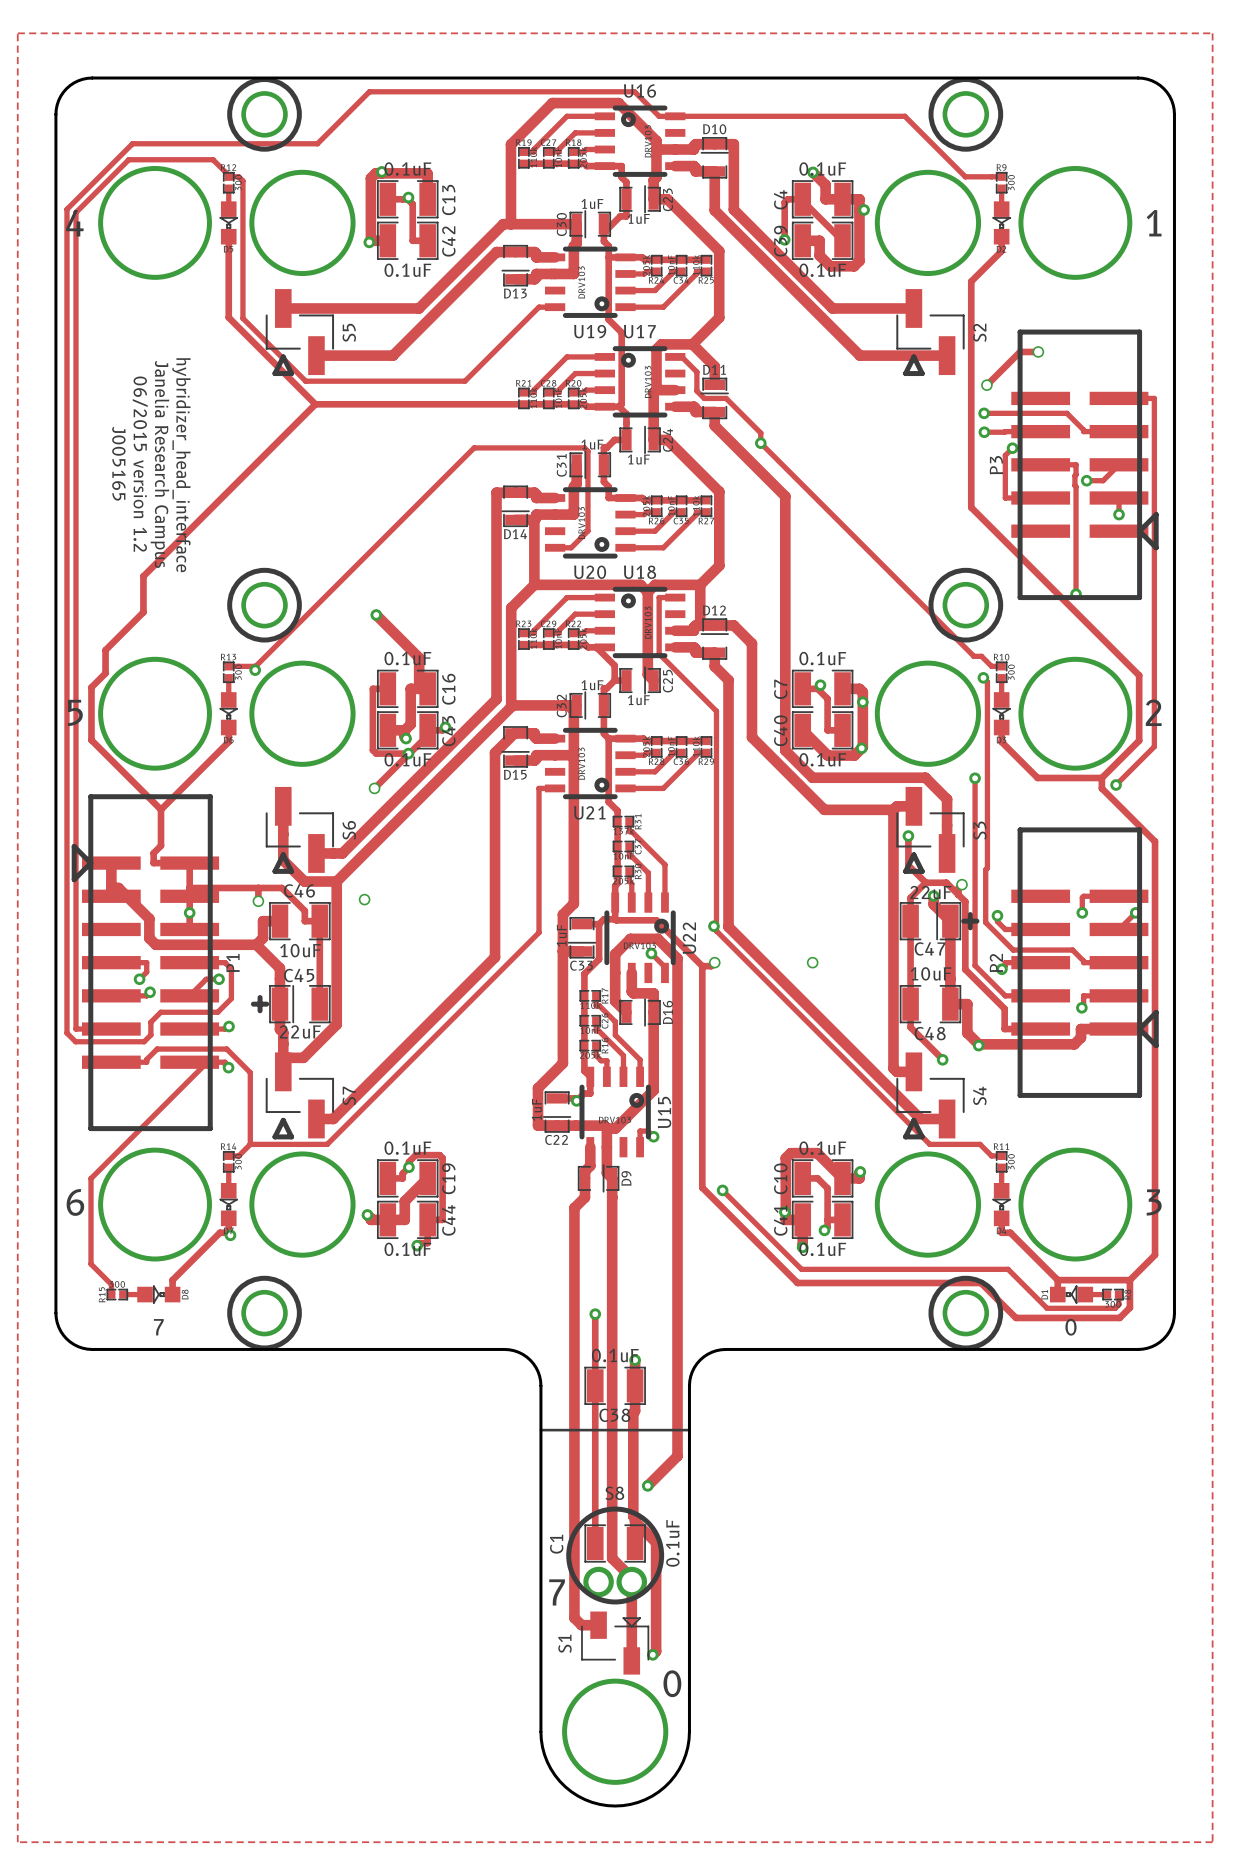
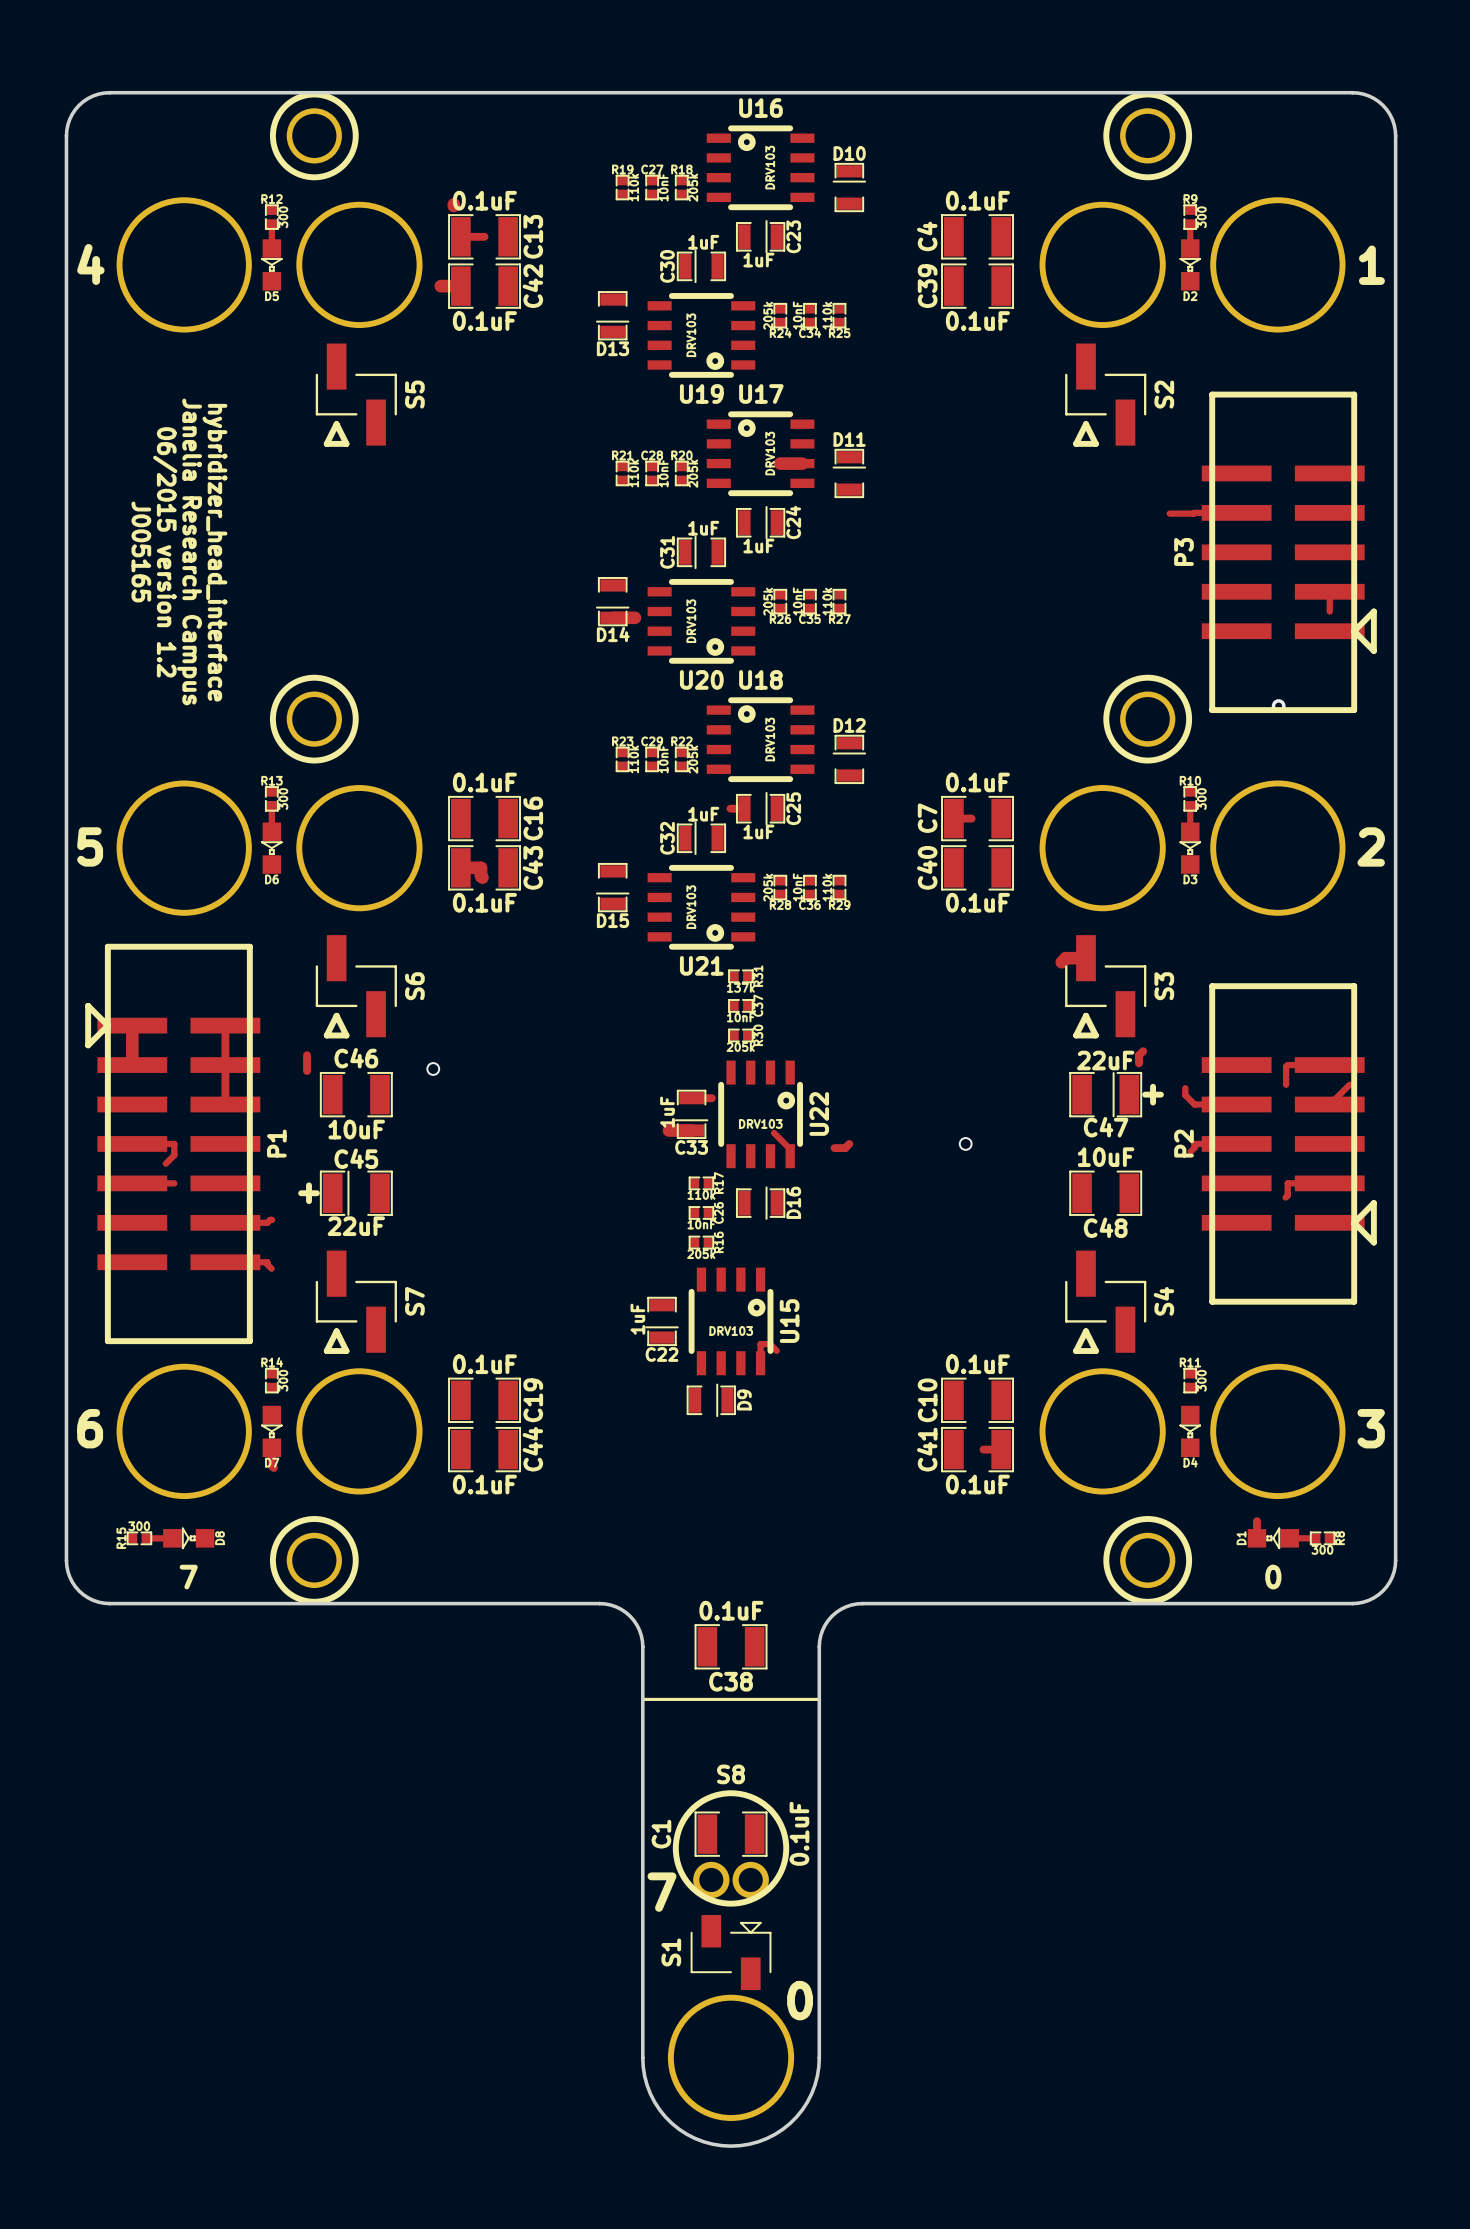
zone outline: (17, 33) (17, 1842) (1212, 1842) (1212, 33) (17, 33) -> none
track: (604, 116) (567, 116) (533, 149) (533, 151) (523, 151) -> none
track: (604, 132) (575, 132) (558, 149) (558, 151) (548, 151) -> none
track: (604, 149) (573, 151) -> none
track: (656, 149) (694, 149) (695, 144) (733, 144) (733, 209) (832, 308) (913, 308) -> none
track: (523, 163) (621, 166) (621, 177) (626, 182) (626, 216) (620, 216) (603, 232) -> none
track: (675, 166) (694, 166) (695, 171) (714, 171) (714, 210) (859, 355) (947, 355) -> none
via: (381, 171) -> none
track: (813, 172) (825, 184) (825, 199) (859, 199) (859, 260) (854, 266) (830, 266) (819, 255) (819, 240) (802, 240) -> none
via: (813, 172) -> none
track: (228, 176) (238, 176) (242, 180) (242, 318) (305, 381) (464, 381) (539, 307) (555, 307) -> none
track: (230, 176) (213, 159) (128, 159) (76, 212) (76, 1029) (111, 1029) -> none
track: (1001, 176) (965, 176) (904, 116) (659, 116) (634, 91) (369, 91) (317, 143) (132, 143) (66, 209) (66, 1033) (75, 1041) (144, 1041) (150, 1035) (150, 1022) (160, 1012) (217, 1012) (231, 998) (231, 969) (225, 962) (189, 962) -> none
track: (408, 197) (407, 199) (412, 204) (412, 240) (427, 240) -> none
via: (408, 197) -> none
track: (427, 199) (426, 173) (375, 173) (370, 178) (370, 240) (369, 242) -> none
via: (864, 209) -> none
track: (510, 224) (510, 144) (552, 103) (618, 103) (656, 140) (656, 177) (653, 180) (653, 199) (667, 199) (719, 251) (719, 317) (692, 344) -> none
track: (603, 224) (603, 241) (608, 246) (608, 319) (621, 332) (621, 404) (619, 406) -> none
track: (228, 236) (228, 317) (315, 404) -> none
track: (1001, 236) (1001, 251) (971, 281) (971, 507) (1139, 675) (1139, 740) (1101, 777) -> none
track: (784, 239) (784, 202) (787, 199) (802, 199) (842, 240) -> none
via: (784, 239) -> none
via: (369, 242) -> none
track: (555, 257) (536, 257) (534, 252) (496, 252) (392, 355) (316, 355) -> none
track: (608, 257) (642, 257) (644, 259) (706, 259) -> none
track: (656, 271) (625, 273) -> none
track: (681, 271) (671, 271) (671, 274) (655, 290) (625, 290) -> none
track: (706, 271) (696, 271) (696, 274) (663, 307) (625, 307) -> none
track: (515, 279) (534, 279) (536, 273) (573, 273) (573, 246) (576, 243) (576, 224) (503, 224) (419, 308) (283, 308) -> none
track: (692, 344) (714, 366) (714, 384) -> none
track: (692, 344) (661, 344) (656, 349) (653, 439) (667, 439) (719, 491) (719, 565) (700, 584) -> none
track: (1038, 351) (1020, 351) (986, 385) -> none
via: (1038, 351) -> none
track: (604, 356) (567, 356) (533, 390) (533, 392) (523, 392) -> none
track: (675, 356) (681, 356) (696, 372) (696, 391) (704, 398) (726, 398) (760, 433) (760, 443) (973, 656) (981, 656) (991, 666) (1001, 666) -> none
track: (604, 373) (575, 373) (558, 390) (558, 392) (548, 392) -> none
via: (986, 385) -> none
track: (604, 390) (573, 392) -> none
track: (1119, 398) (1154, 398) (1154, 746) (1116, 784) -> none
track: (315, 404) (584, 404) (586, 406) (619, 406) -> none
track: (315, 404) (143, 576) (143, 612) (105, 650) (105, 673) (91, 687) (91, 740) (161, 809) -> none
track: (619, 406) (626, 414) (626, 439) (614, 439) (606, 447) (603, 447) (603, 481) (608, 486) (608, 498) (642, 498) (644, 500) (706, 500) -> none
track: (675, 406) (694, 406) (695, 412) (714, 412) (714, 425) (785, 496) (785, 750) (812, 777) (925, 777) (947, 799) (947, 853) -> none
track: (984, 413) (1066, 413) (1083, 431) (1119, 431) -> none
via: (984, 413) -> none
via: (984, 432) -> none
via: (760, 443) -> none
track: (1012, 448) (1005, 455) (1005, 498) (1040, 498) -> none
via: (1012, 448) -> none
track: (576, 464) (576, 483) (573, 486) (573, 514) (536, 514) (534, 519) (534, 584) -> none
track: (1040, 464) (1076, 464) (1076, 594) -> none
track: (1119, 464) (1103, 480) (1086, 480) -> none
via: (1086, 480) -> none
track: (555, 498) (536, 498) (534, 492) (496, 492) (496, 699) (342, 853) (316, 853) -> none
track: (656, 512) (625, 514) -> none
track: (681, 512) (671, 512) (671, 514) (655, 531) (625, 531) -> none
track: (706, 512) (696, 512) (696, 514) (663, 547) (625, 547) -> none
via: (1119, 514) -> none
track: (555, 547) (571, 547) (587, 531) (587, 451) (584, 447) (474, 447) (255, 666) -> none
track: (534, 584) (640, 584) (647, 592) -> none
track: (534, 584) (511, 608) (511, 707) (336, 881) -> none
track: (700, 584) (700, 625) -> none
track: (700, 584) (655, 584) (647, 592) -> none
track: (647, 592) (647, 674) (653, 680) -> none
track: (604, 597) (567, 597) (533, 630) (533, 633) (523, 633) -> none
track: (675, 597) (659, 597) (659, 653) (716, 711) (716, 931) (929, 1144) (980, 1144) (991, 1155) (1001, 1155) -> none
track: (376, 614) (419, 657) (419, 688) -> none
via: (376, 614) -> none
track: (604, 614) (575, 614) (558, 630) (558, 633) (548, 633) -> none
track: (604, 630) (573, 633) -> none
track: (675, 630) (694, 630) (695, 625) (733, 625) (751, 643) (751, 737) (824, 809) (893, 809) (893, 1068) (896, 1071) (913, 1071) -> none
track: (523, 644) (585, 644) (588, 647) (604, 647) -> none
track: (596, 647) (614, 665) (614, 680) (606, 688) (603, 688) (603, 733) (608, 738) -> none
track: (675, 647) (694, 647) (695, 652) (714, 652) (714, 666) (728, 680) (728, 926) (920, 1118) (947, 1118) -> none
track: (228, 666) (255, 666) -> none
via: (255, 670) -> none
track: (983, 677) (987, 681) (985, 922) (1013, 950) (1072, 950) (1083, 962) (1119, 962) -> none
via: (983, 677) -> none
track: (820, 685) (817, 688) (827, 698) (827, 730) (842, 730) -> none
via: (820, 685) -> none
track: (387, 688) (372, 688) (372, 750) (376, 753) (409, 753) (427, 735) (427, 730) (442, 730) (445, 727) -> none
track: (427, 688) (410, 688) (410, 724) (404, 730) -> none
track: (842, 688) (859, 688) (862, 692) (862, 747) (854, 755) (827, 755) (802, 730) -> none
via: (862, 702) -> none
track: (511, 705) (576, 705) -> none
track: (568, 705) (573, 710) (573, 903) (562, 914) (562, 1063) (538, 1088) (538, 1125) (604, 1125) (606, 1128) -> none
track: (228, 727) (228, 741) (161, 809) -> none
via: (445, 727) -> none
track: (1001, 727) (1001, 741) (1037, 777) (1101, 777) -> none
via: (406, 738) -> none
track: (555, 738) (536, 738) (534, 733) (514, 733) (495, 752) (495, 957) (333, 1118) (316, 1118) -> none
track: (608, 738) (706, 741) -> none
track: (608, 738) (608, 802) (617, 810) (617, 883) (615, 885) (615, 919) (603, 919) (599, 924) (599, 959) (584, 973) (584, 1070) (590, 1076) (590, 1093) (584, 1093) (576, 1100) (574, 1098) (557, 1098) -> none
via: (861, 748) -> none
track: (656, 752) (625, 755) -> none
track: (681, 752) (671, 752) (671, 755) (655, 771) (625, 771) -> none
track: (706, 752) (696, 752) (696, 755) (663, 788) (625, 788) -> none
track: (408, 753) (374, 788) -> none
via: (408, 753) -> none
track: (573, 755) (536, 755) (534, 760) (515, 760) -> none
track: (1101, 777) (1101, 788) (1155, 841) (1155, 1255) (1129, 1280) -> none
track: (975, 778) (975, 965) (1005, 995) (1040, 995) -> none
via: (975, 778) -> none
via: (1116, 784) -> none
via: (374, 788) -> none
track: (555, 788) (539, 788) (539, 932) (327, 1144) (250, 1144) -> none
track: (283, 806) (283, 860) (304, 881) (336, 881) -> none
track: (161, 809) (161, 845) (153, 853) (153, 863) (189, 863) -> none
track: (629, 821) (629, 831) (631, 831) (664, 864) (664, 902) -> none
track: (908, 836) (908, 865) (925, 882) -> none
via: (908, 836) -> none
track: (629, 846) (629, 856) (631, 856) (648, 873) (648, 902) -> none
track: (629, 871) (631, 902) -> none
track: (336, 881) (336, 1024) (303, 1057) (283, 1057) -> none
track: (925, 882) (910, 897) (910, 1027) (942, 1059) -> none
track: (925, 882) (946, 882) (965, 901) (965, 969) (1004, 1008) (1004, 1029) (1040, 1029) -> none
via: (962, 884) -> none
track: (111, 887) (118, 887) (149, 918) (149, 938) (155, 944) (256, 944) -> none
track: (189, 887) (281, 887) (304, 910) (304, 921) (319, 921) (319, 1004) -> none
track: (933, 895) (933, 904) (950, 921) (950, 1004) (967, 1004) (967, 1032) (978, 1044) -> none
via: (933, 895) -> none
via: (258, 901) -> none
via: (189, 912) -> none
via: (1082, 912) -> none
via: (1135, 912) -> none
via: (997, 915) -> none
track: (615, 919) (656, 920) (702, 966) (702, 1187) (797, 1282) (981, 1282) (1015, 1317) (1119, 1317) (1129, 1307) (1129, 1280) -> none
track: (279, 921) (263, 921) (263, 938) (256, 944) -> none
via: (713, 926) -> none
track: (256, 944) (279, 968) (279, 1029) (283, 1032) (283, 1071) -> none
via: (651, 953) -> none
via: (714, 962) -> none
via: (1001, 969) -> none
track: (631, 972) (631, 991) (633, 993) (653, 993) (653, 1090) (615, 1128) (606, 1128) -> none
via: (139, 979) -> none
track: (219, 979) (206, 979) (189, 995) -> none
via: (219, 979) -> none
via: (150, 992) -> none
track: (596, 995) (596, 1005) (599, 1005) (615, 1021) (615, 1035) (640, 1059) (640, 1076) -> none
via: (1081, 1007) -> none
track: (626, 1012) (615, 1001) (615, 954) (630, 938) (657, 938) (677, 958) (677, 1456) (647, 1485) -> none
track: (596, 1020) (596, 1030) (598, 1030) (623, 1055) (623, 1076) -> none
via: (229, 1026) -> none
track: (1119, 1029) (1081, 1029) (1081, 1037) (1074, 1044) (978, 1044) -> none
track: (596, 1045) (596, 1055) (601, 1060) (606, 1060) (606, 1076) -> none
via: (978, 1045) -> none
via: (942, 1059) -> none
track: (111, 1062) (146, 1062) (146, 1059) (157, 1049) (226, 1049) (250, 1072) (250, 1144) -> none
track: (207, 1062) (90, 1178) (90, 1264) (111, 1284) (111, 1294) -> none
via: (228, 1067) -> none
via: (576, 1100) -> none
track: (606, 1128) (606, 1173) (612, 1178) (612, 1558) (631, 1578) (631, 1660) -> none
via: (653, 1136) -> none
track: (250, 1144) (238, 1155) (228, 1155) -> none
track: (590, 1147) (590, 1165) (584, 1171) (584, 1197) (574, 1208) (574, 1617) (581, 1625) (598, 1625) -> none
track: (228, 1167) (228, 1190) -> none
via: (408, 1167) -> none
track: (1001, 1167) (1001, 1190) -> none
track: (860, 1171) (859, 1178) (842, 1178) (817, 1153) (790, 1153) (785, 1158) (785, 1219) (802, 1219) (802, 1247) -> none
via: (860, 1171) -> none
track: (387, 1178) (402, 1178) (402, 1173) (408, 1167) (408, 1161) (415, 1155) (439, 1155) (442, 1158) (442, 1219) (427, 1219) (427, 1243) (419, 1243) (417, 1245) -> none
track: (427, 1178) (404, 1201) (404, 1219) (370, 1219) (367, 1214) -> none
track: (802, 1178) (817, 1178) (827, 1188) (827, 1227) (824, 1230) -> none
track: (722, 1190) (801, 1269) (1008, 1269) (1047, 1308) (1115, 1308) (1118, 1304) (1118, 1294) -> none
via: (722, 1190) -> none
via: (784, 1212) -> none
via: (367, 1214) -> none
track: (1001, 1218) (1001, 1232) (1010, 1232) (1057, 1280) (1129, 1280) -> none
via: (824, 1230) -> none
track: (228, 1232) (219, 1232) (172, 1280) (172, 1294) -> none
via: (230, 1235) -> none
via: (417, 1245) -> none
via: (802, 1247) -> none
track: (595, 1314) (595, 1543) -> none
via: (595, 1314) -> none
track: (635, 1360) (635, 1411) (633, 1412) (635, 1543) -> none
via: (635, 1360) -> none
via: (647, 1485) -> none
track: (635, 1521) (656, 1542) (656, 1651) (652, 1654) -> none
via: (652, 1654) -> none

